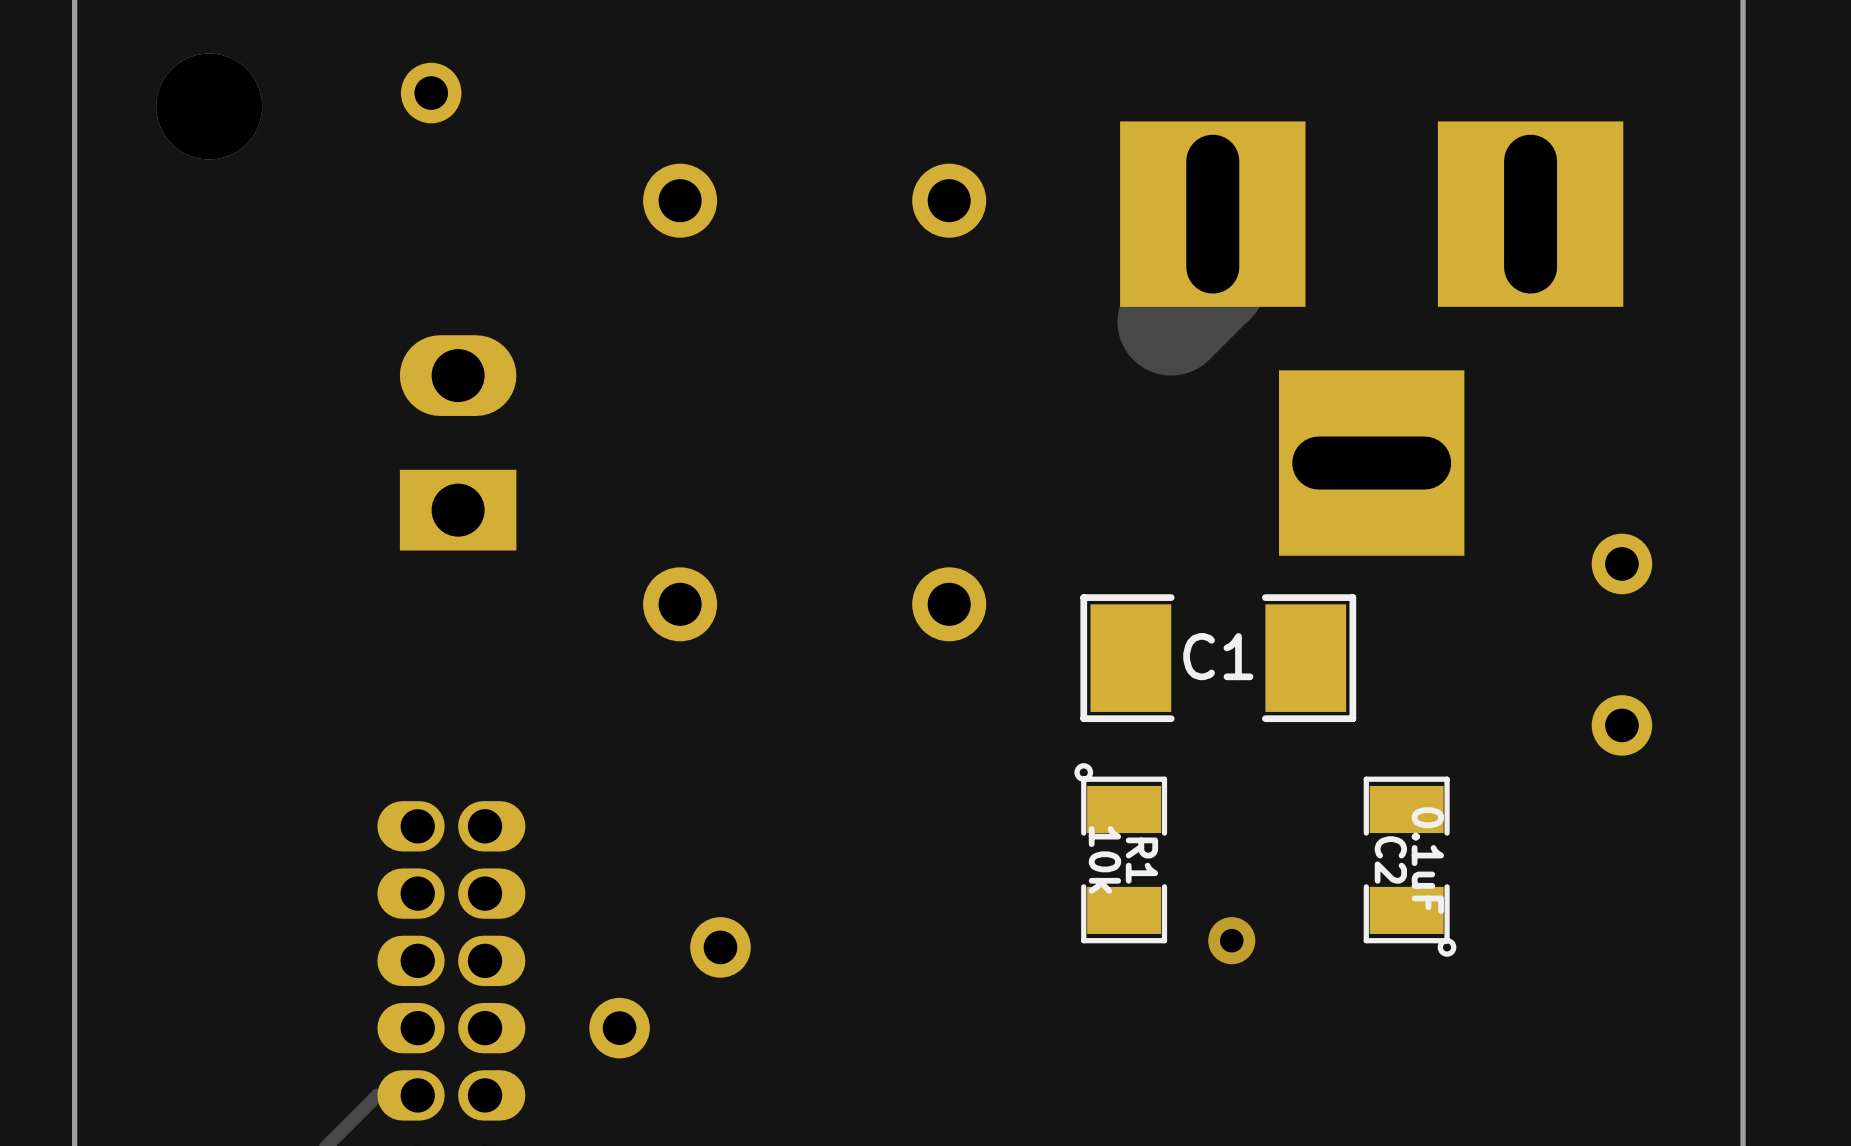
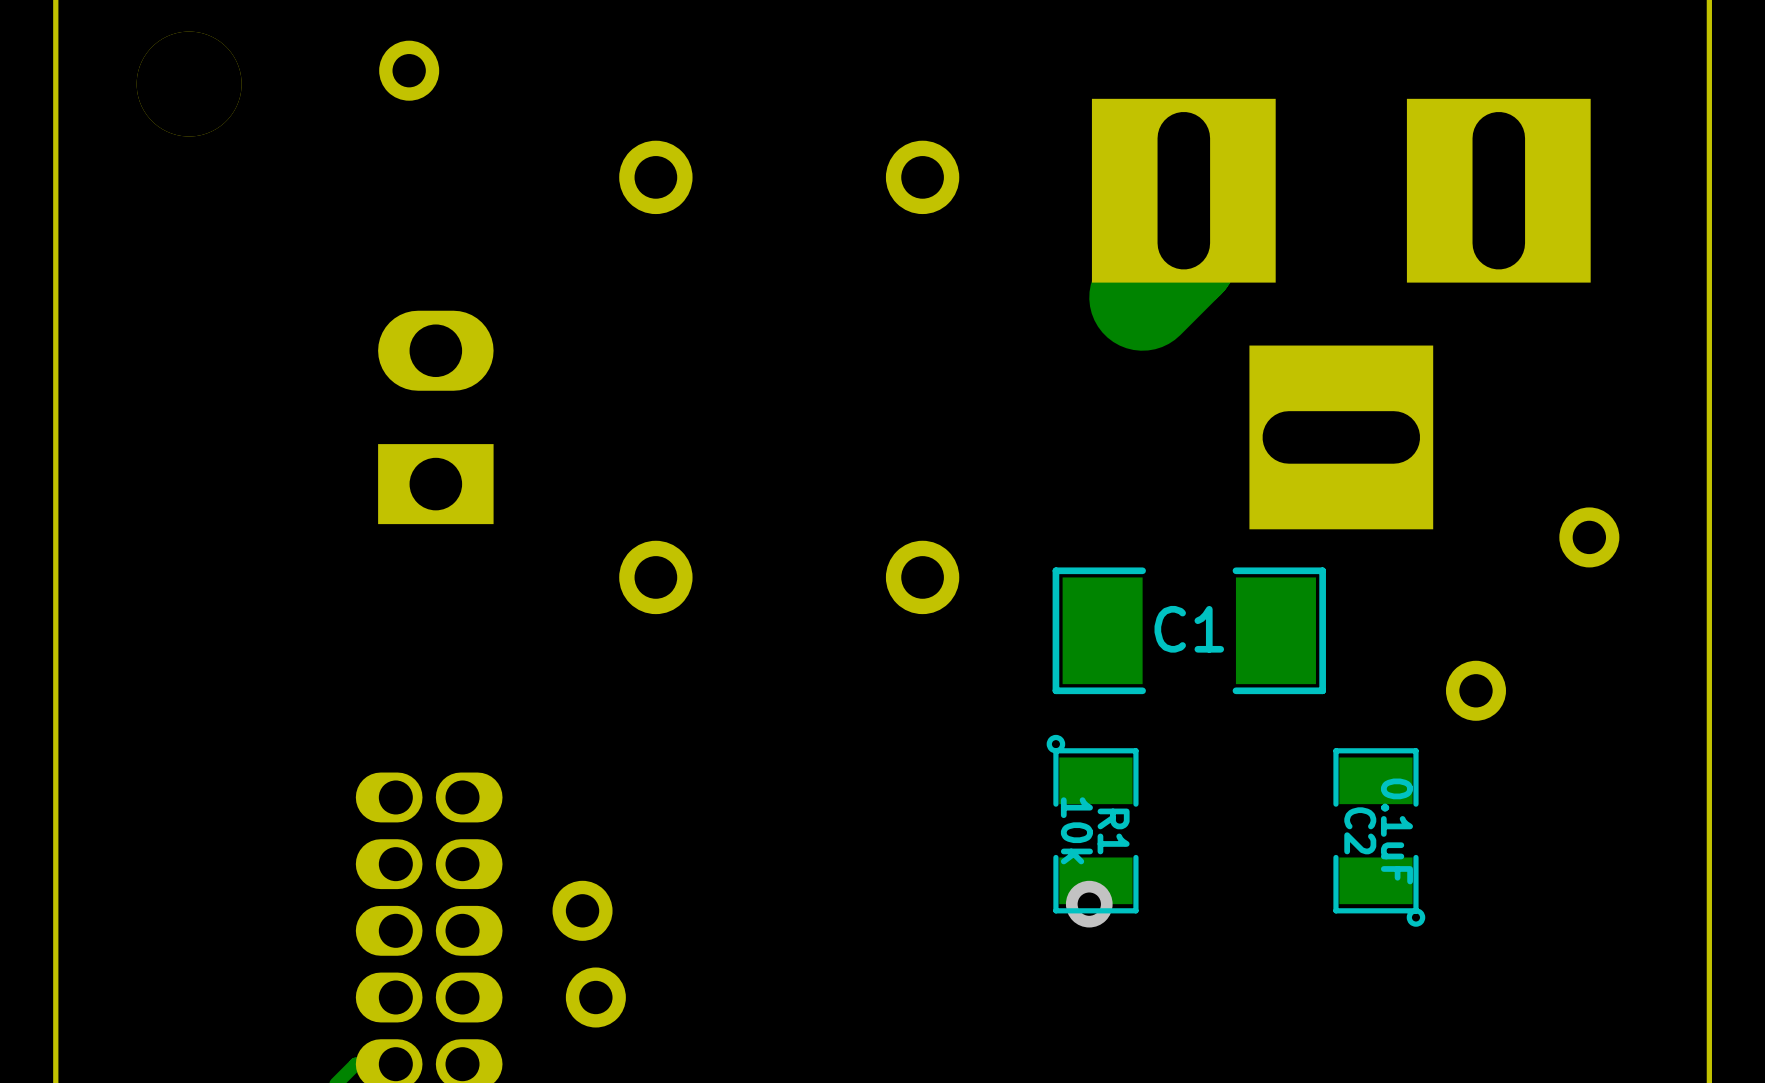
part position: (1621, 725) -> (1475, 690)
via position: (1231, 940) -> (1089, 904)
part position: (720, 947) -> (582, 910)

